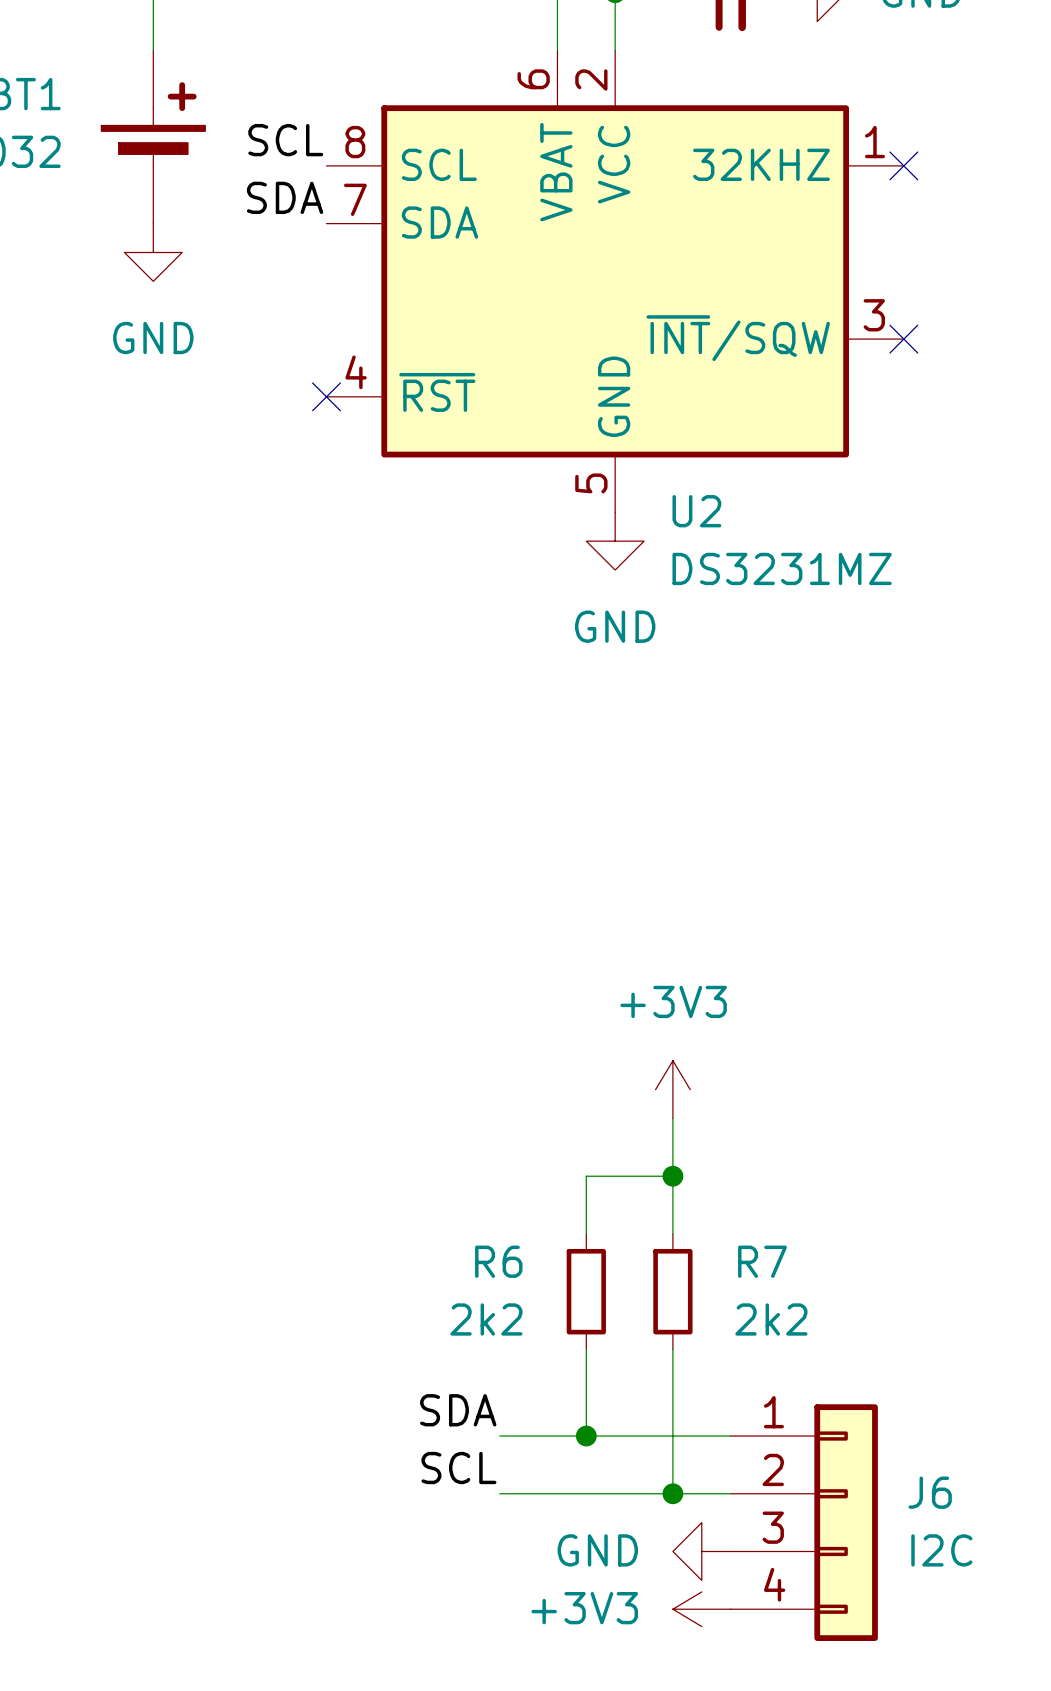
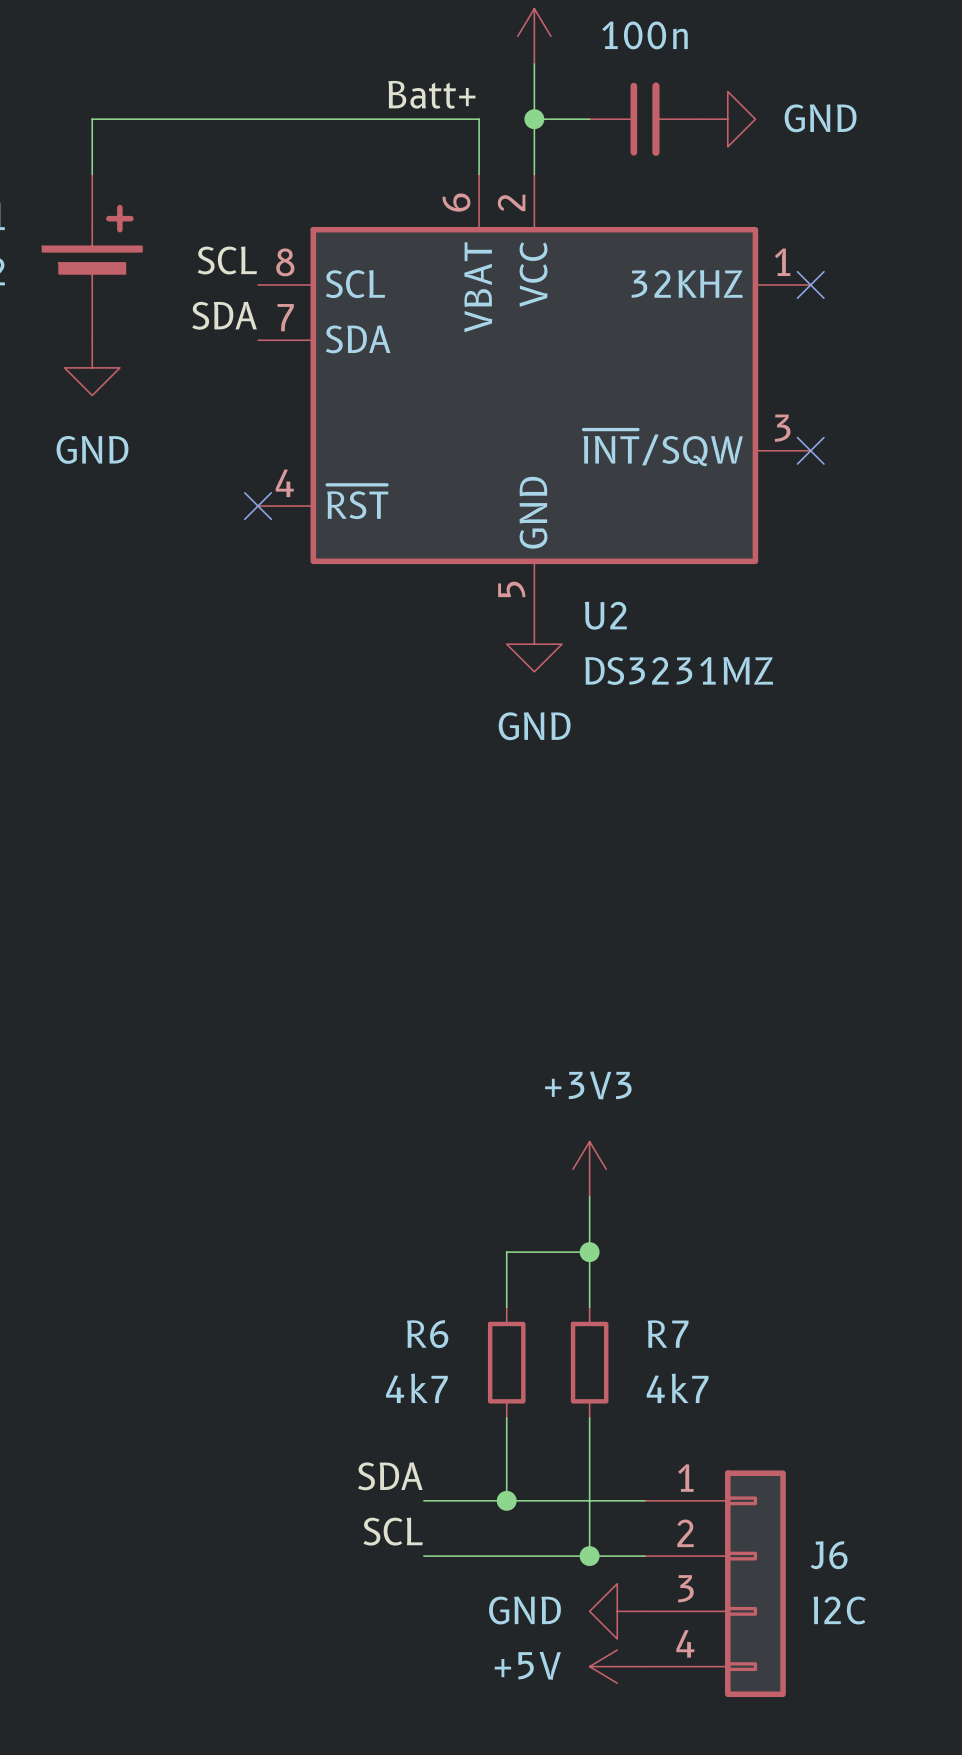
R6 value: 2k2 (486, 1319) -> 4k7 (416, 1388)
R7 value: 2k2 (771, 1319) -> 4k7 (677, 1388)
power symbol: +3V3 (701, 1609) -> +5V (617, 1666)

